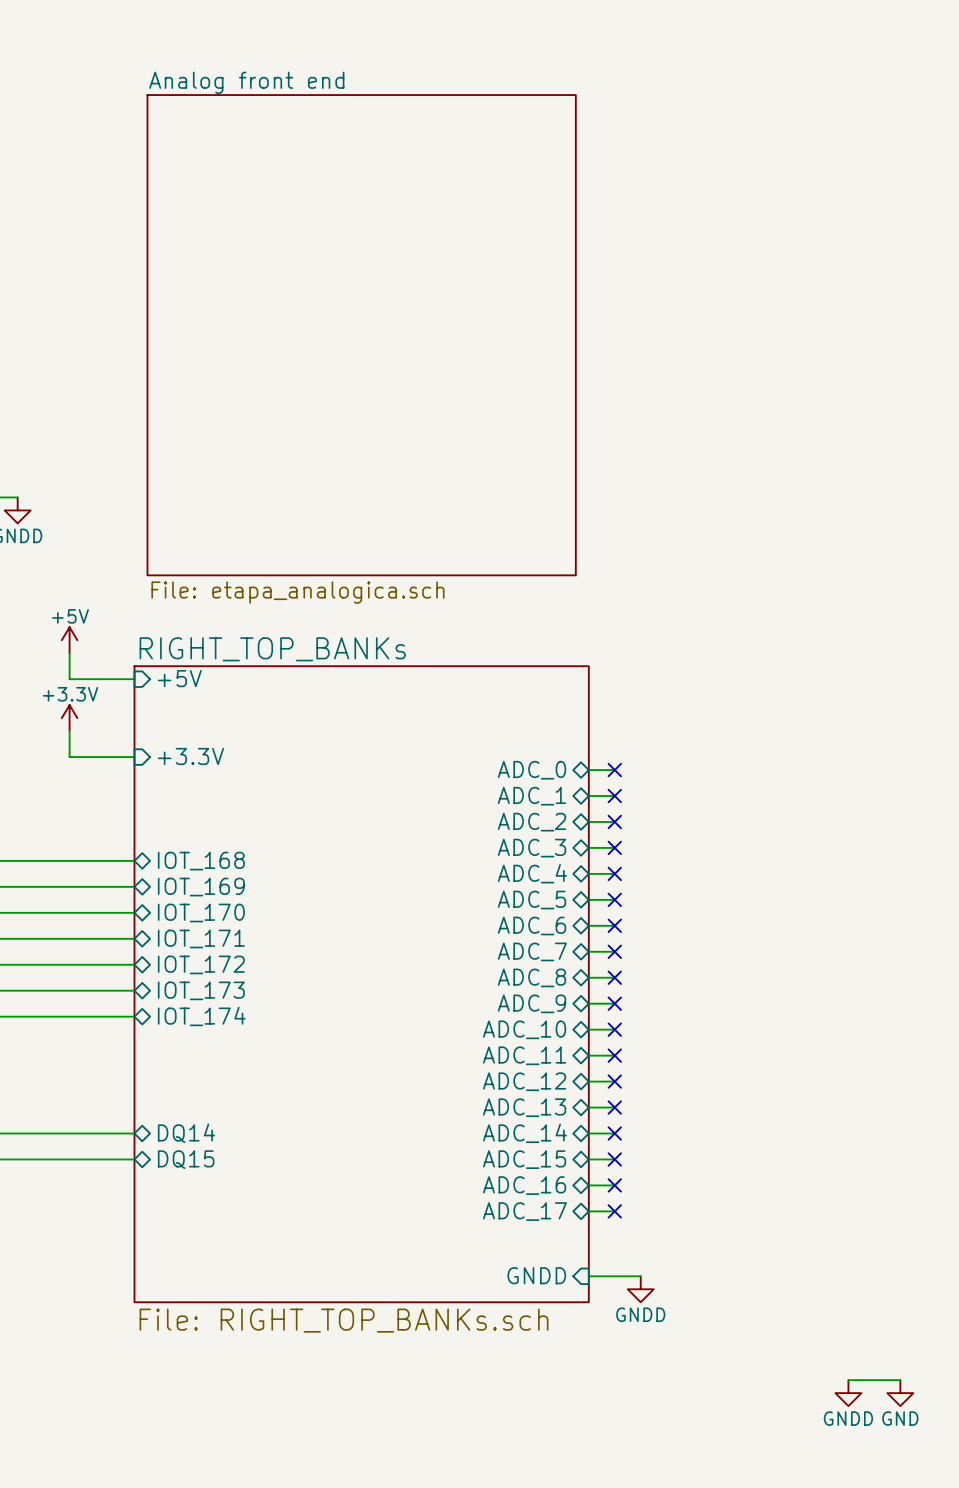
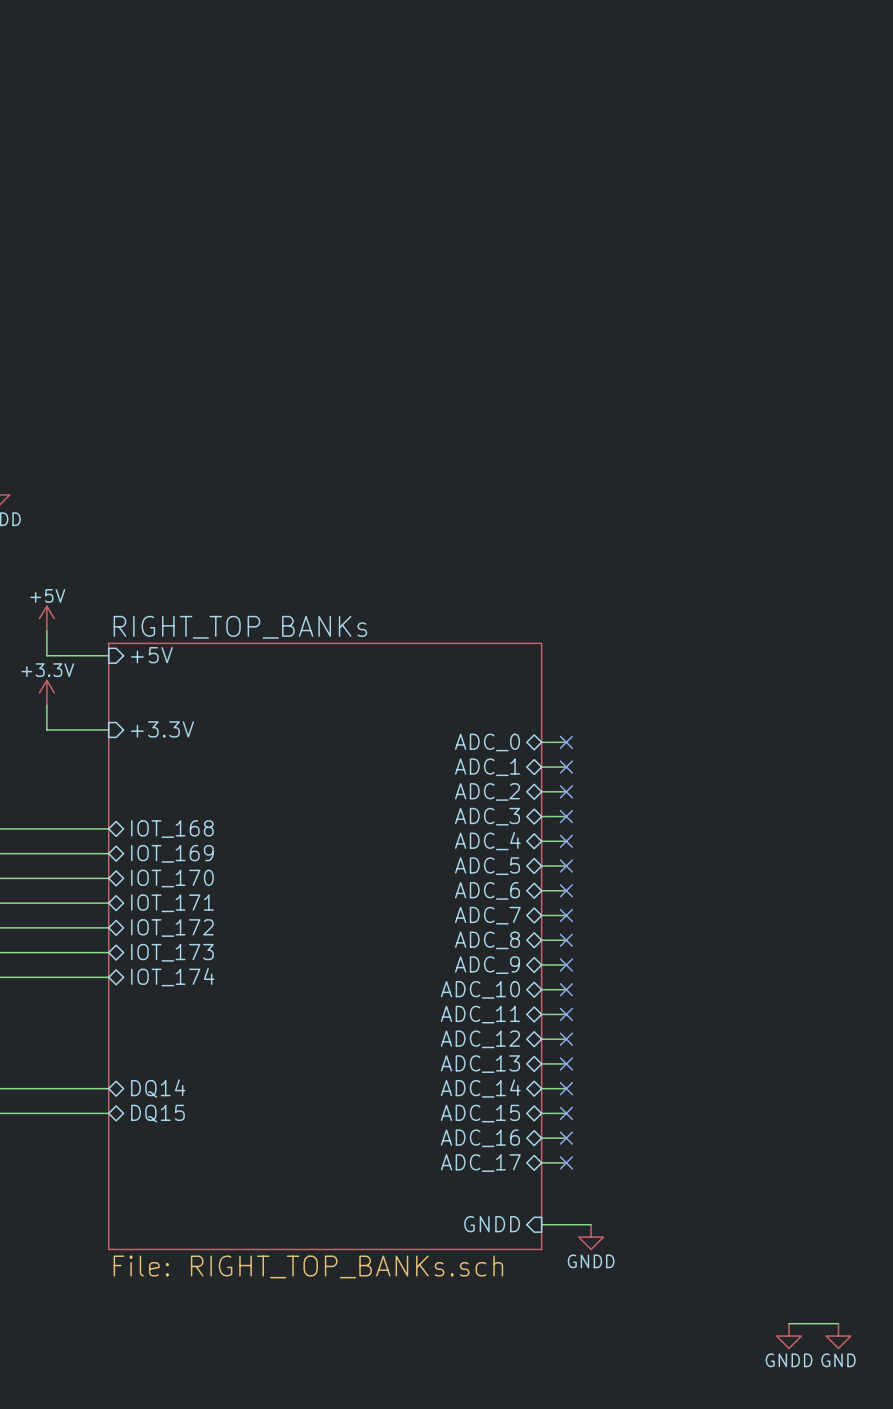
sheet Analog front end: File: etapa_analogica.sch (361, 335) -> none

